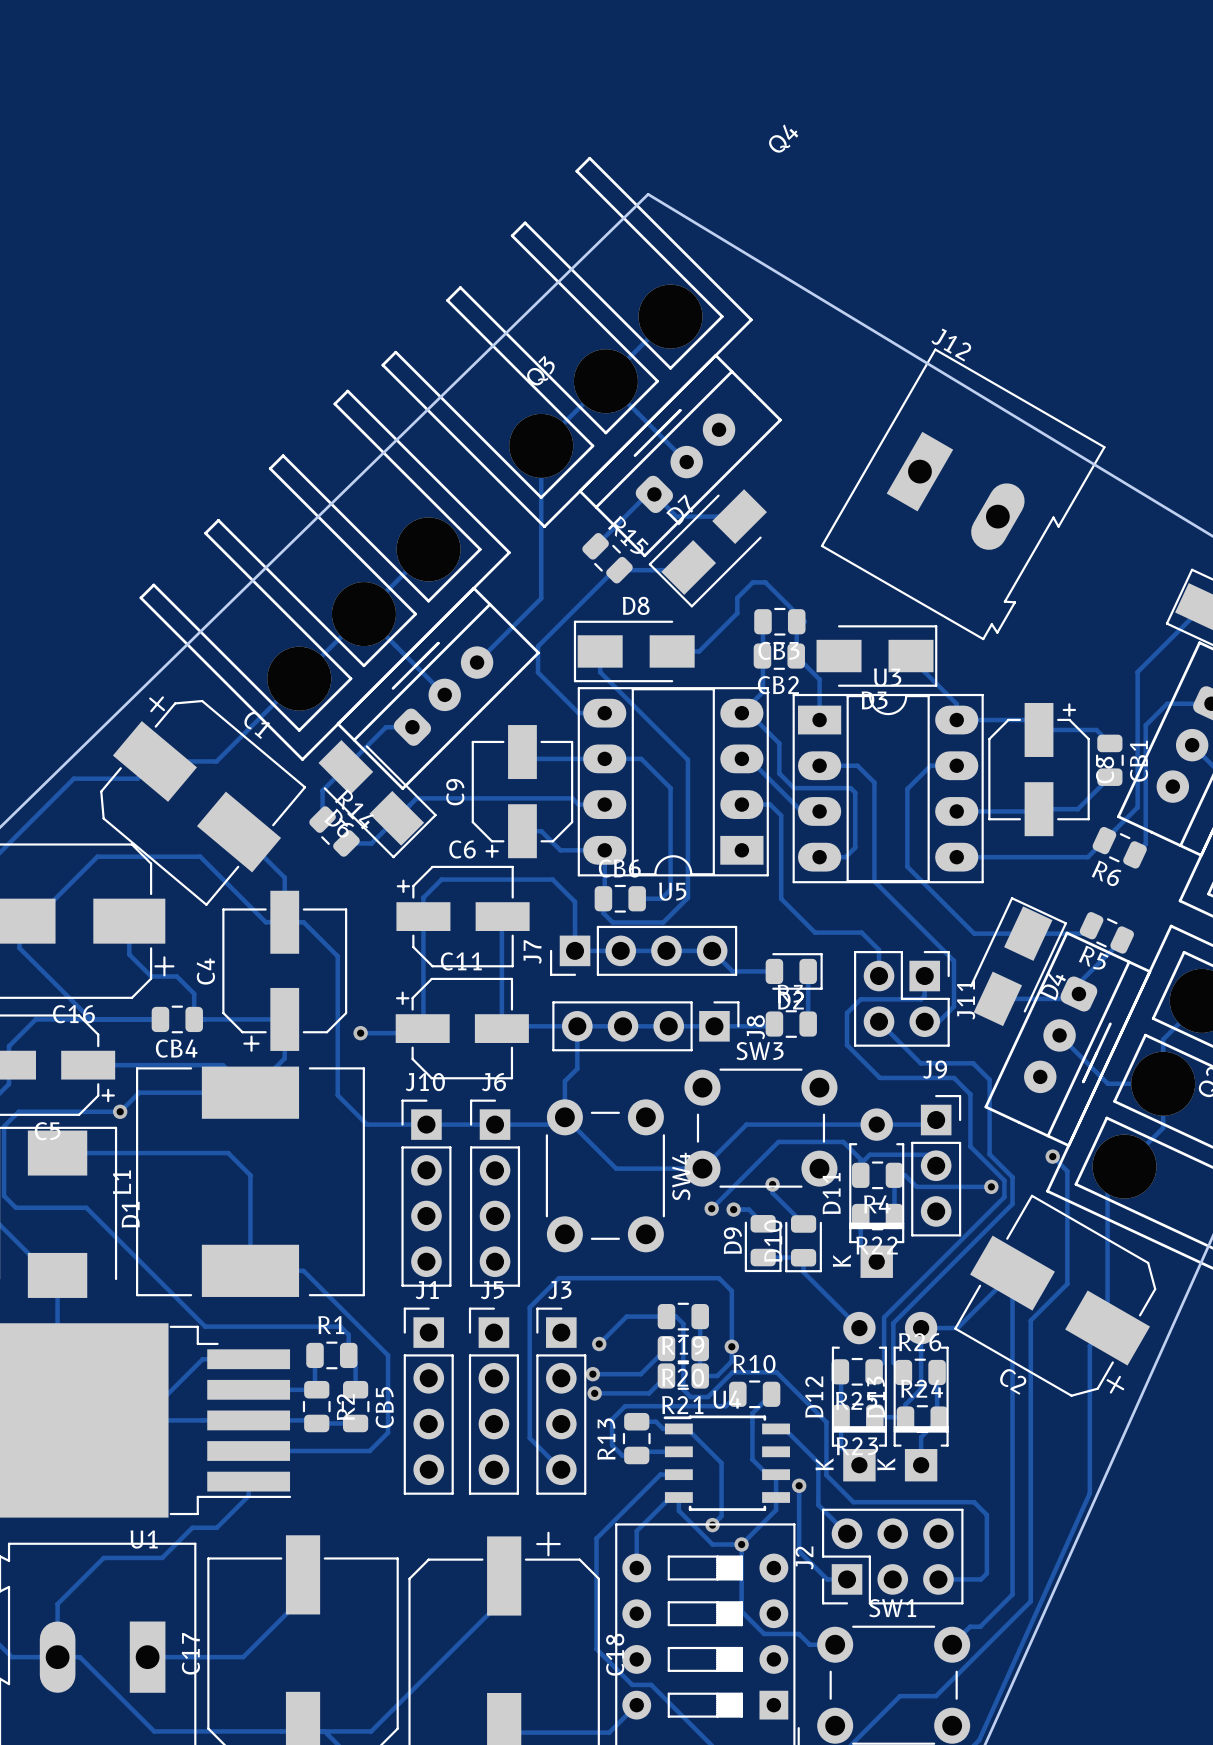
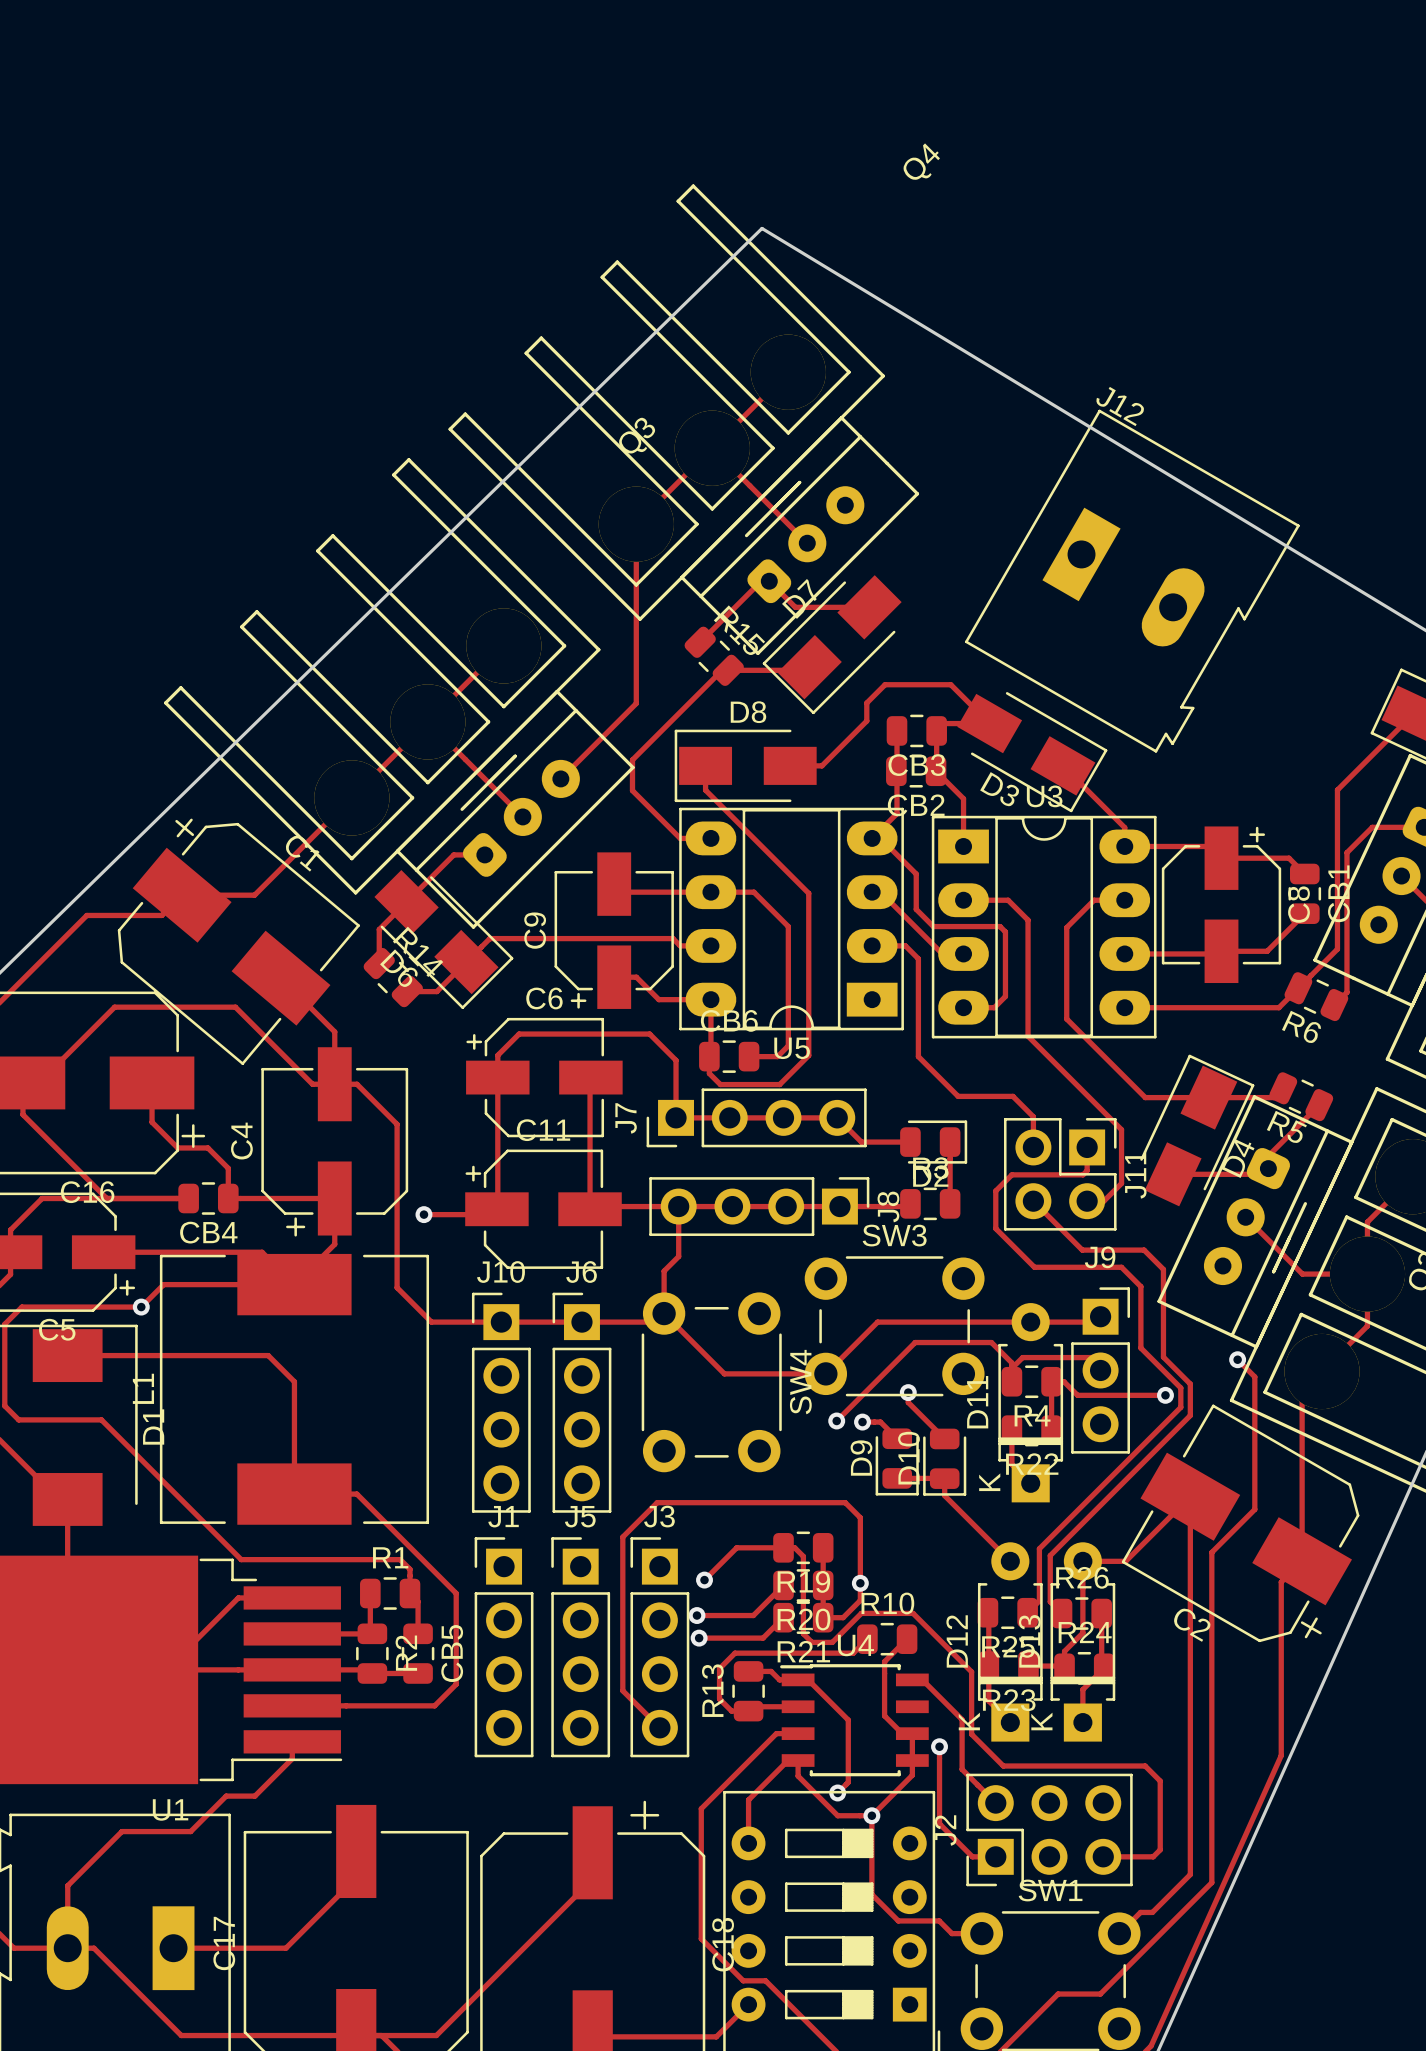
track: (765, 582) (804, 621) (796, 621) -> (899, 684) (950, 684) (989, 723) (944, 723) (936, 730)
D3 rotation: 0° (876, 656) -> 30° clockwise (1032, 752)

